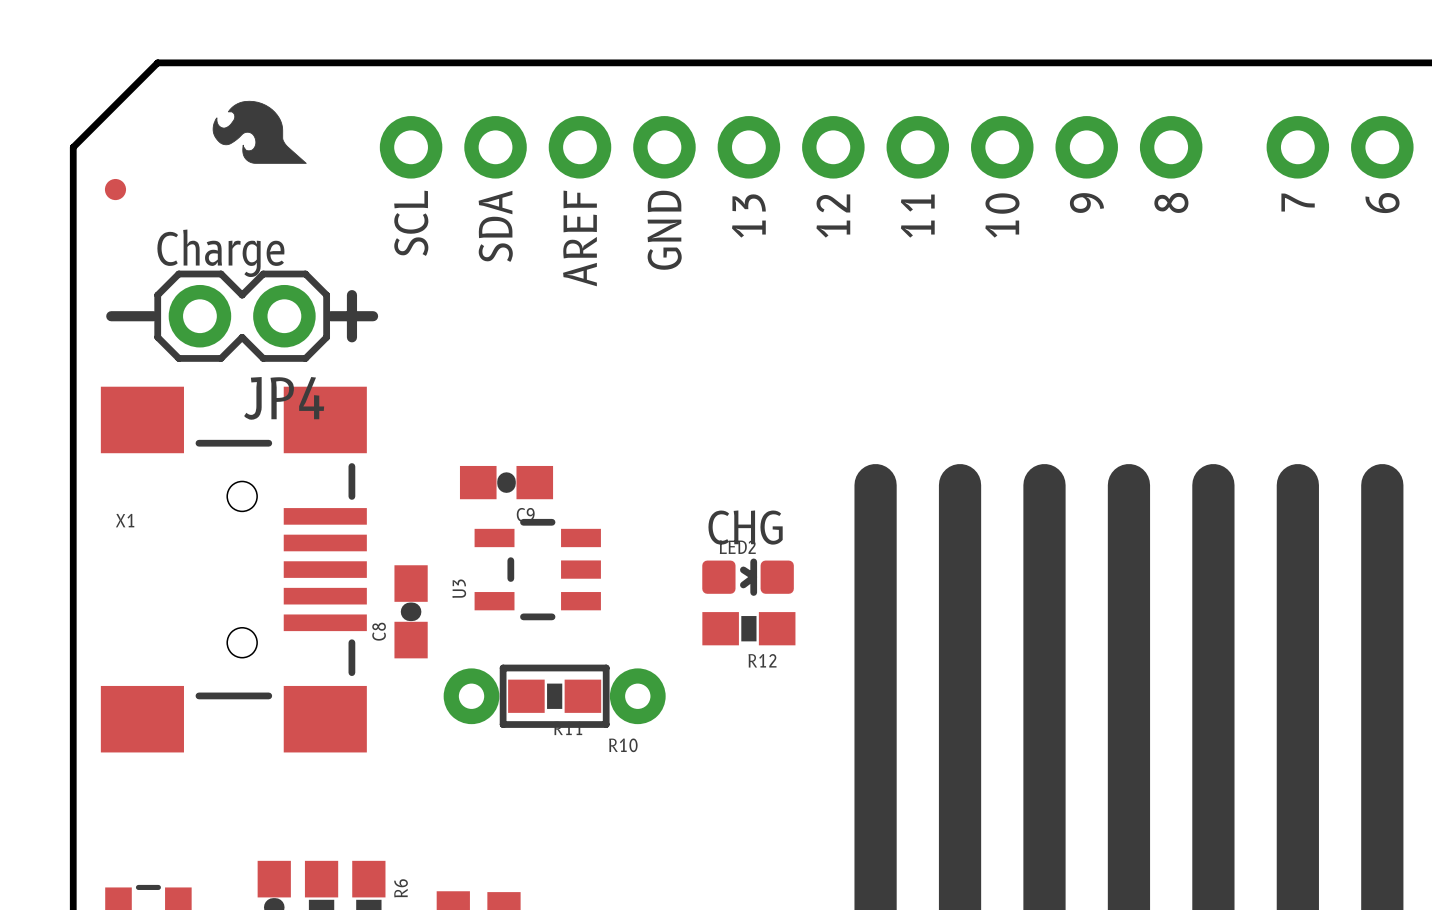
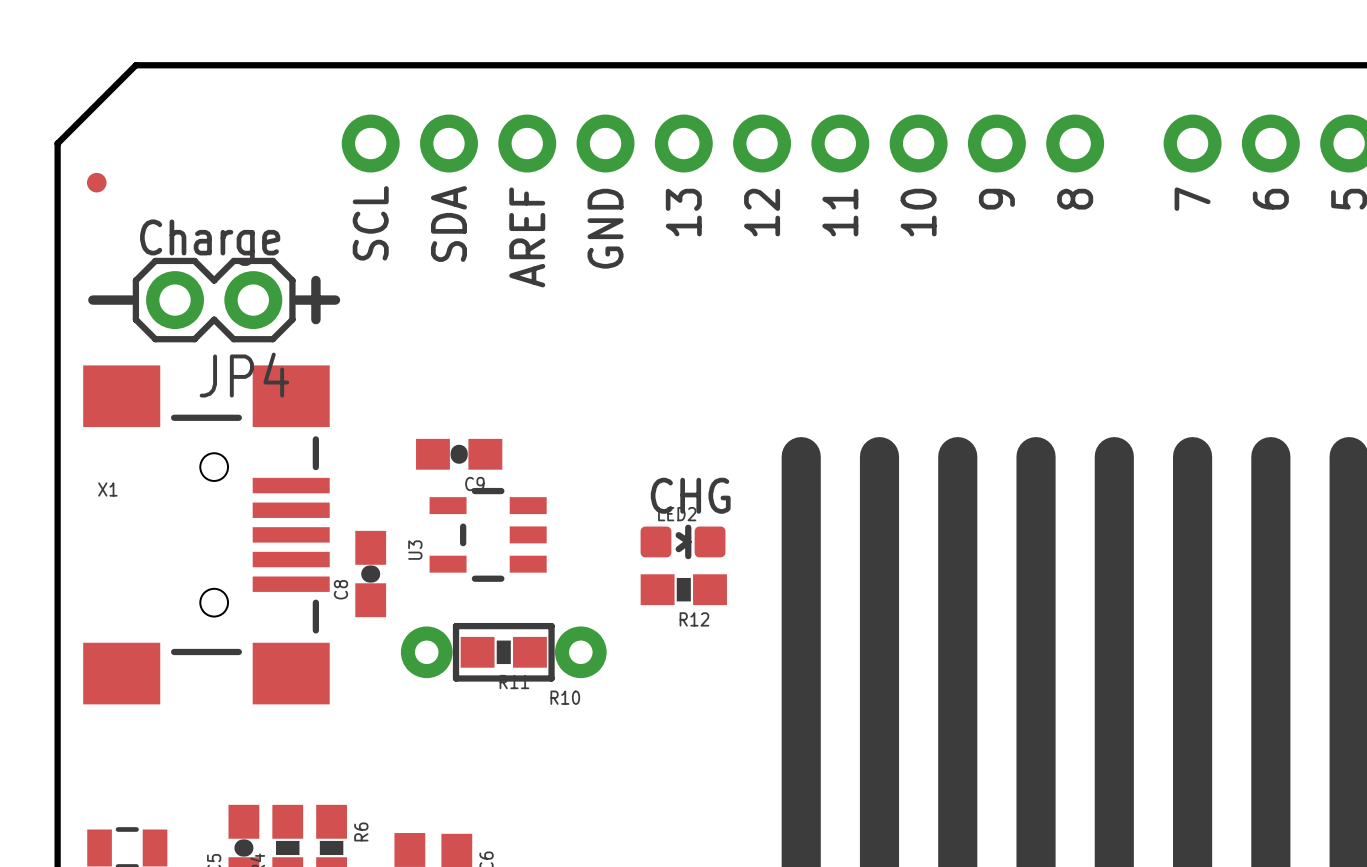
drawing: [212, 100, 307, 164] -> none

